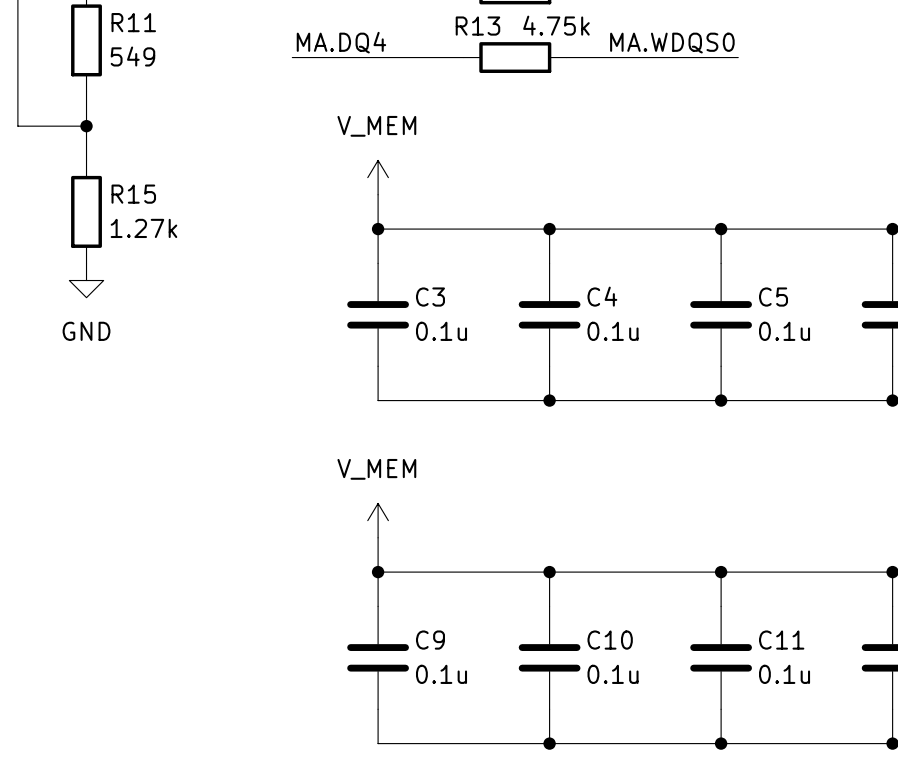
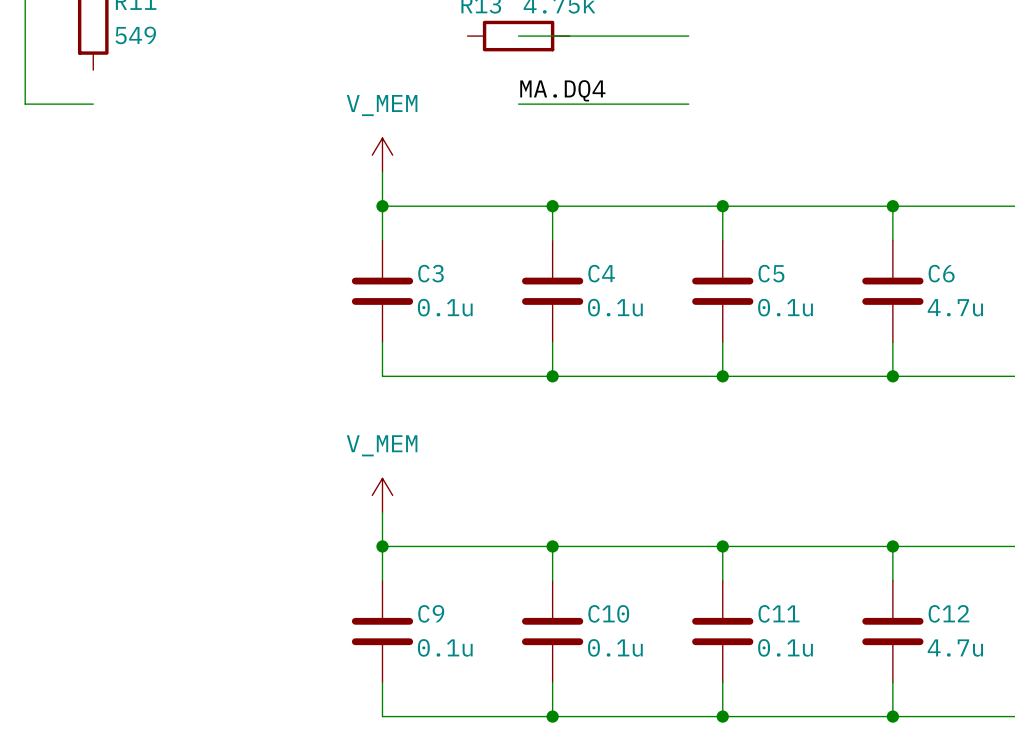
label position: MA.DQ4 (341, 42) -> MA.DQ4 (562, 90)
label: MA.WDQS0 (672, 43) -> none
wire: (292, 57) (463, 57) -> (518, 104) (688, 104)
wire: (686, 57) (738, 57) -> (518, 36) (569, 36)
wire: (86, 91) (86, 160) -> none
junction: (86, 126) -> none
R15: 1.27k (86, 211) -> none
power symbol: GND (86, 280) -> none

